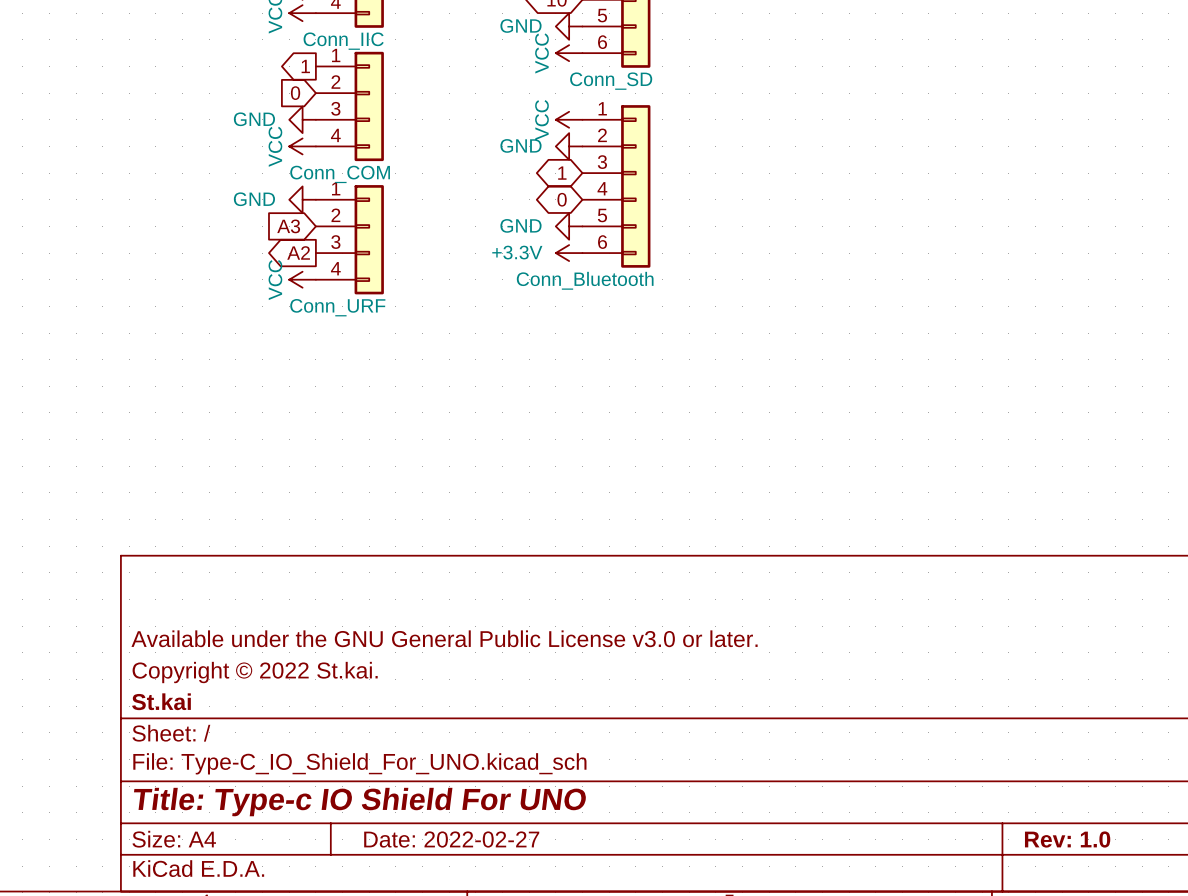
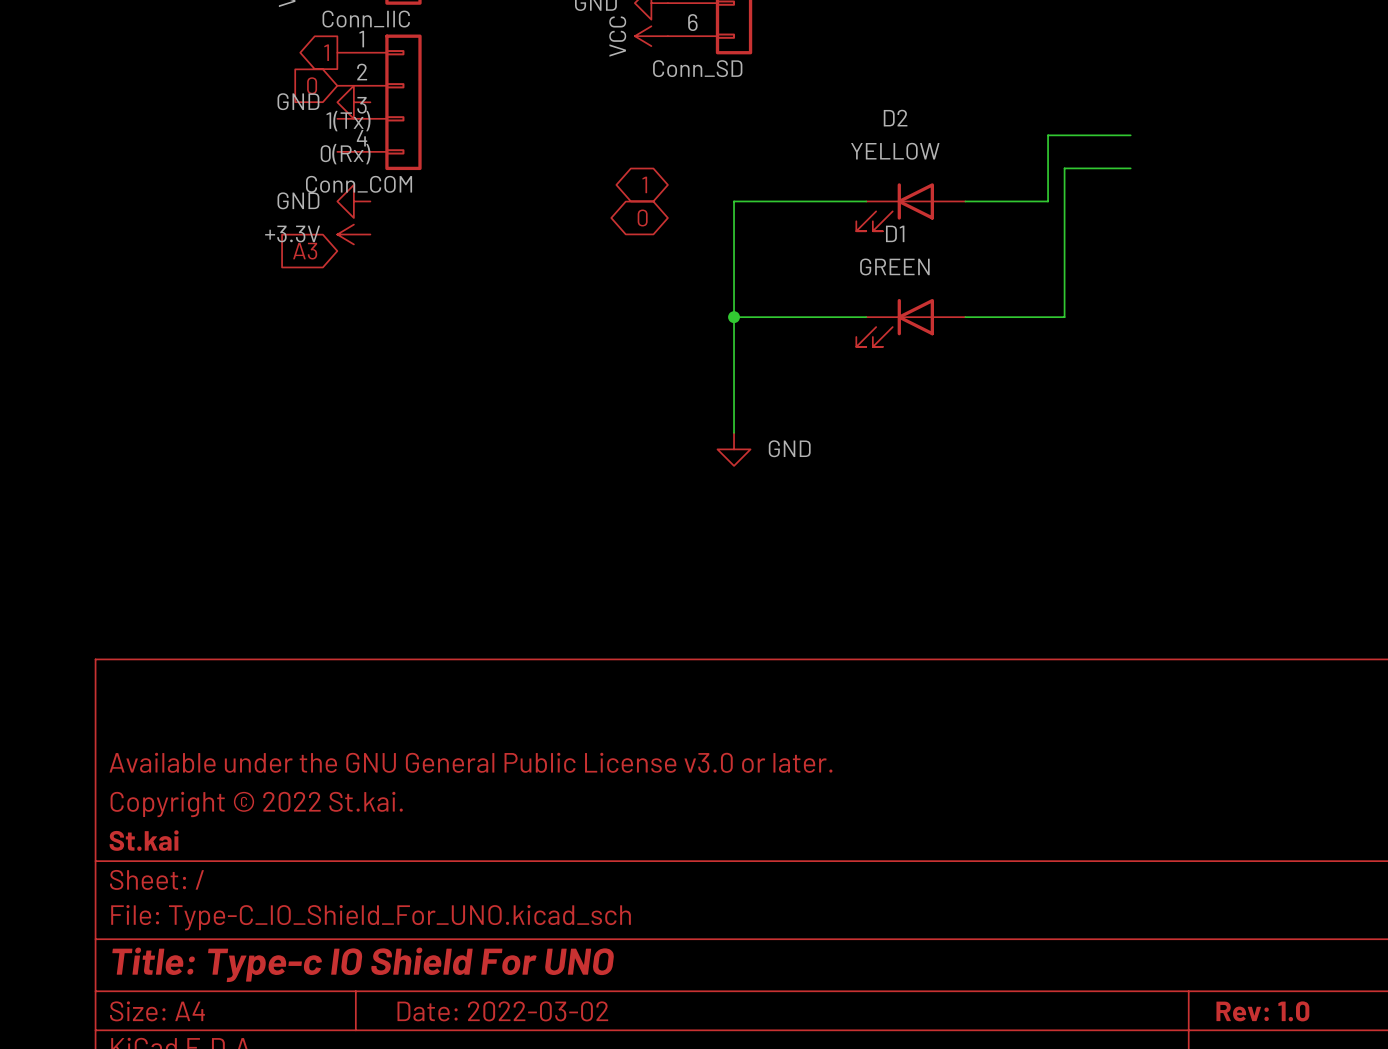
power symbol position: GND (302, 119) -> GND (353, 102)
power symbol: VCC (569, 119) -> none
label: none -> 1(Tx) (348, 121)
wire: none -> (1130, 135) (1048, 135) (1048, 201) (965, 201)
power symbol: VCC (302, 146) -> none
power symbol: GND (569, 146) -> none
label: none -> 0(Rx) (345, 154)
wire: none -> (1130, 168) (1064, 168) (1064, 317) (965, 317)
part: Conn_Bluetooth (616, 186) -> none
wire: none -> (866, 201) (734, 201) (734, 432)
D2: none -> YELLOW (910, 207)
power symbol position: GND (302, 199) -> GND (353, 201)
power symbol: none -> +3.3V (353, 234)
power symbol: GND (569, 226) -> none
part: Conn_URF (349, 239) -> none
global label: A2 (298, 252) -> none
power symbol: +3.3V (569, 253) -> none
power symbol: VCC (302, 279) -> none
wire: none -> (734, 317) (866, 317)
junction: none -> (734, 317)
D1: none -> GREEN (910, 322)
power symbol: none -> GND (734, 449)
title block: Date: 2022-02-27 (451, 839) -> Date: 2022-03-02 (502, 1011)

